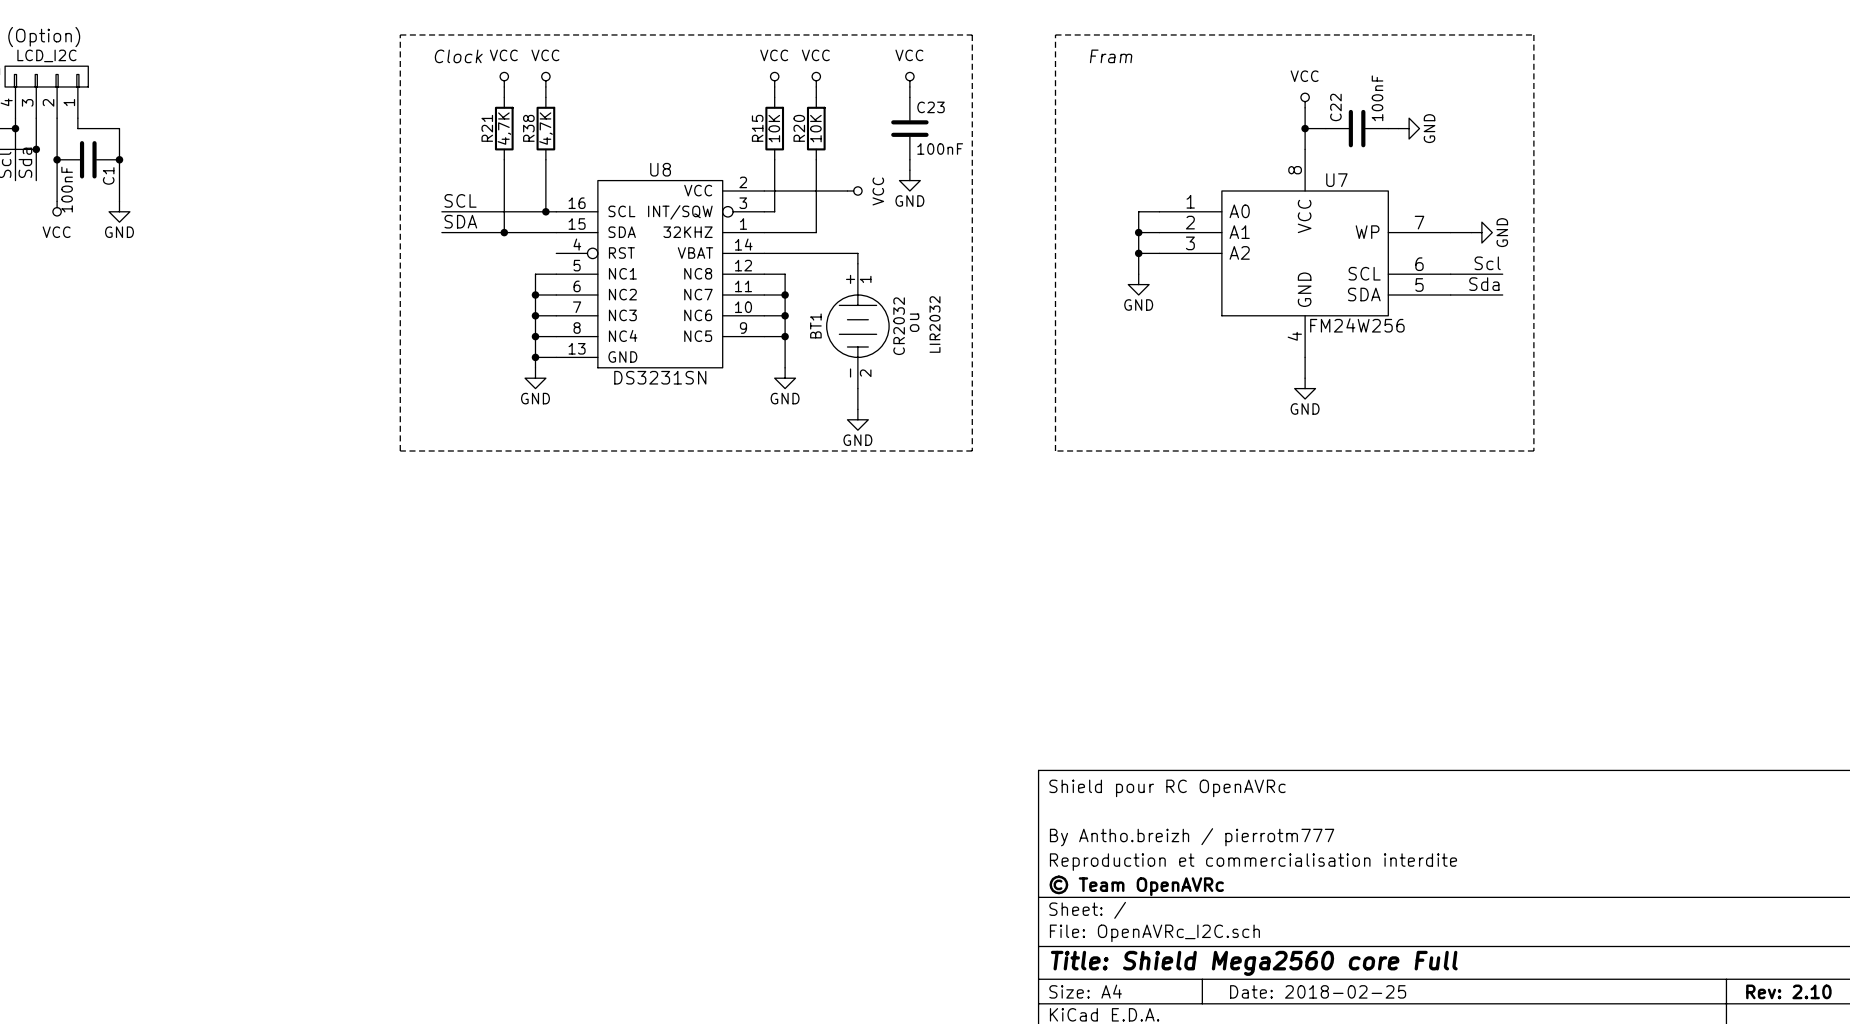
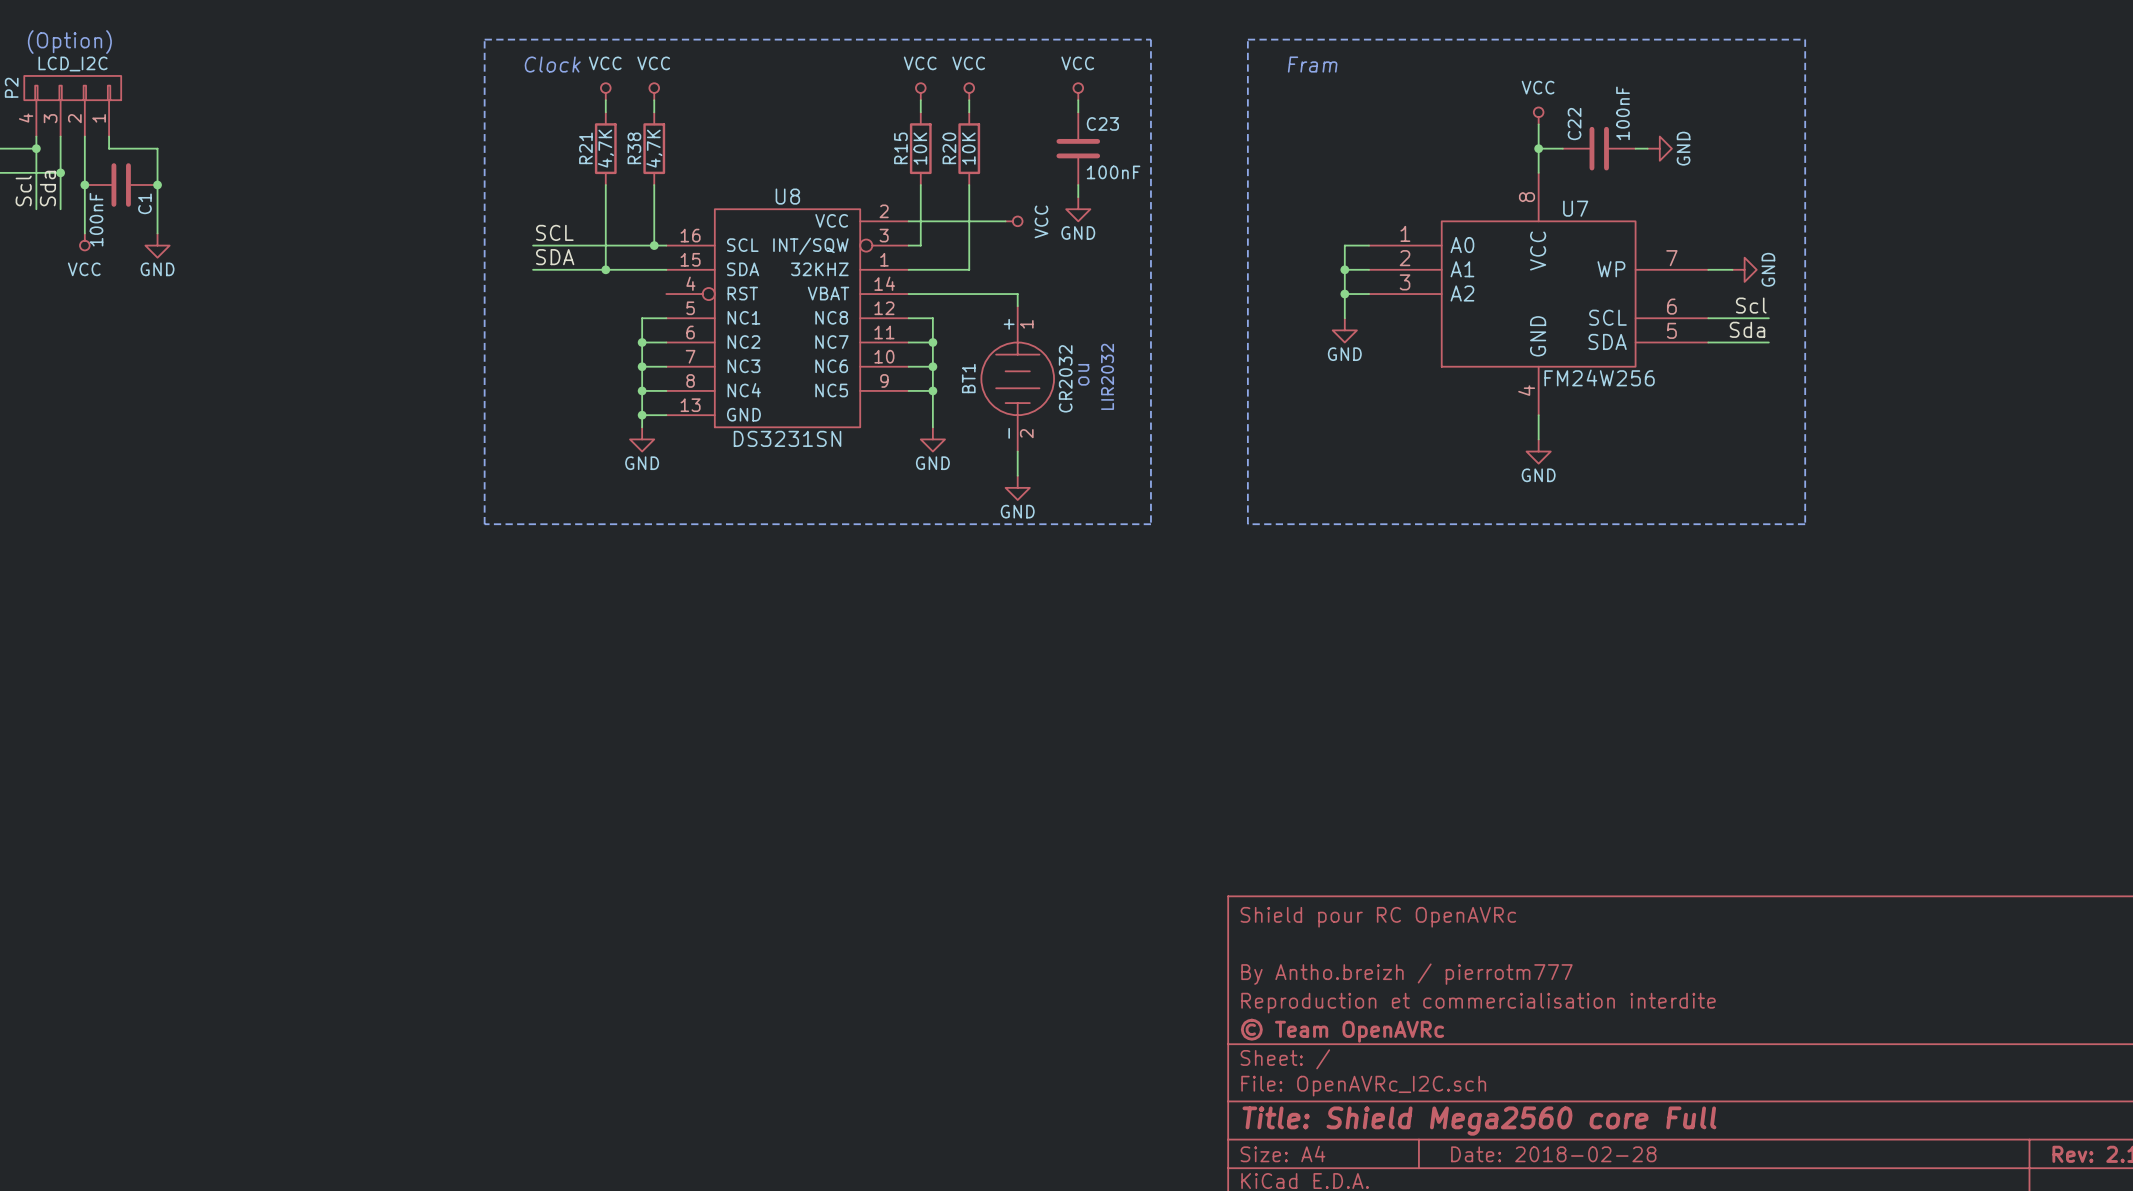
title block: Date: 2018-02-25 (1318, 991) -> Date: 2018-02-28 (1553, 1154)

